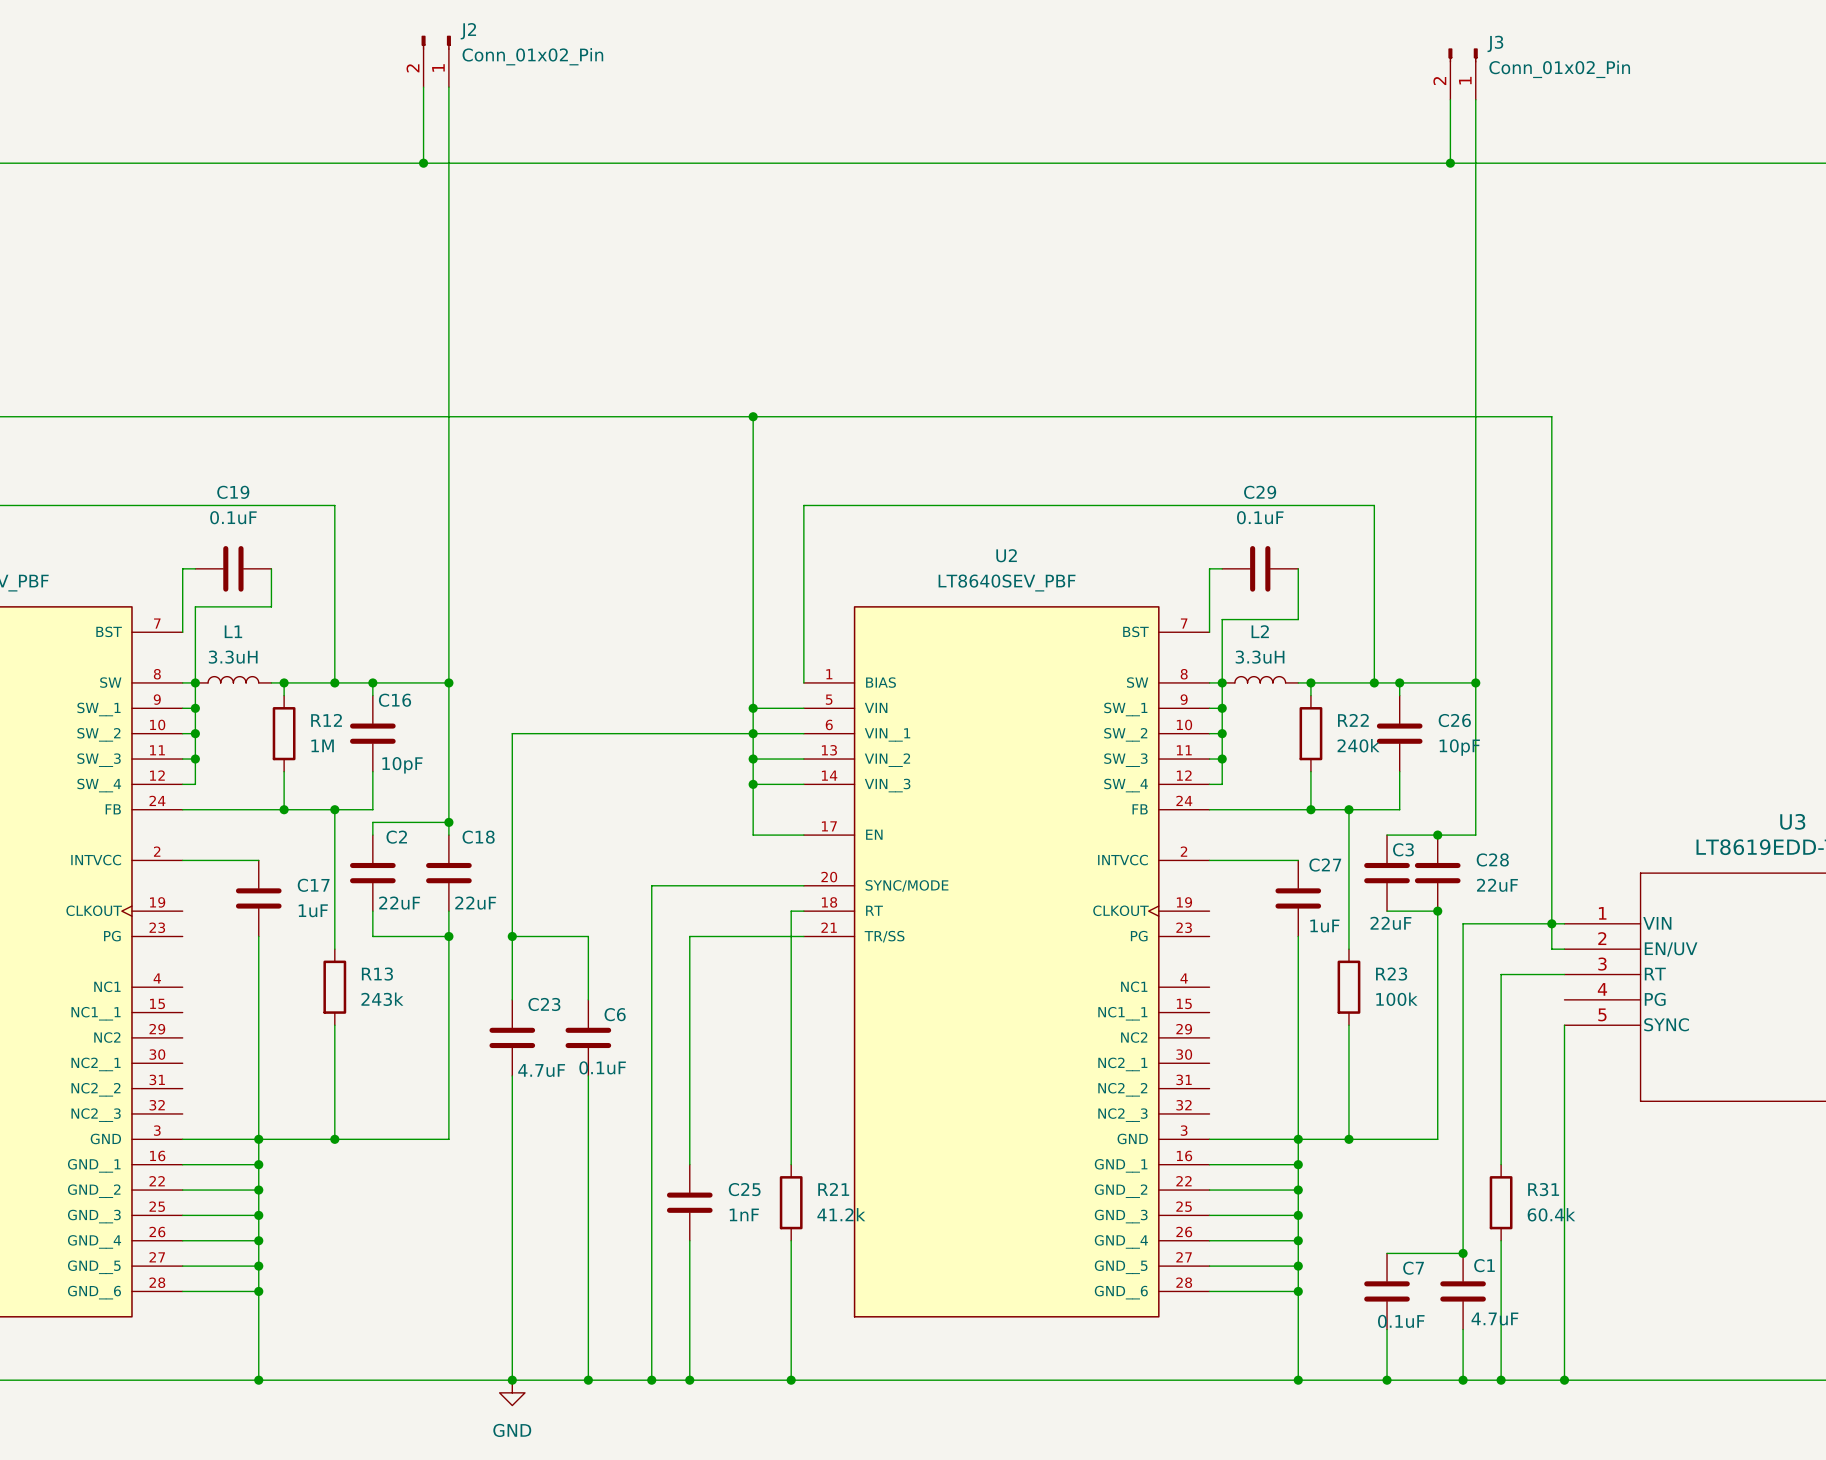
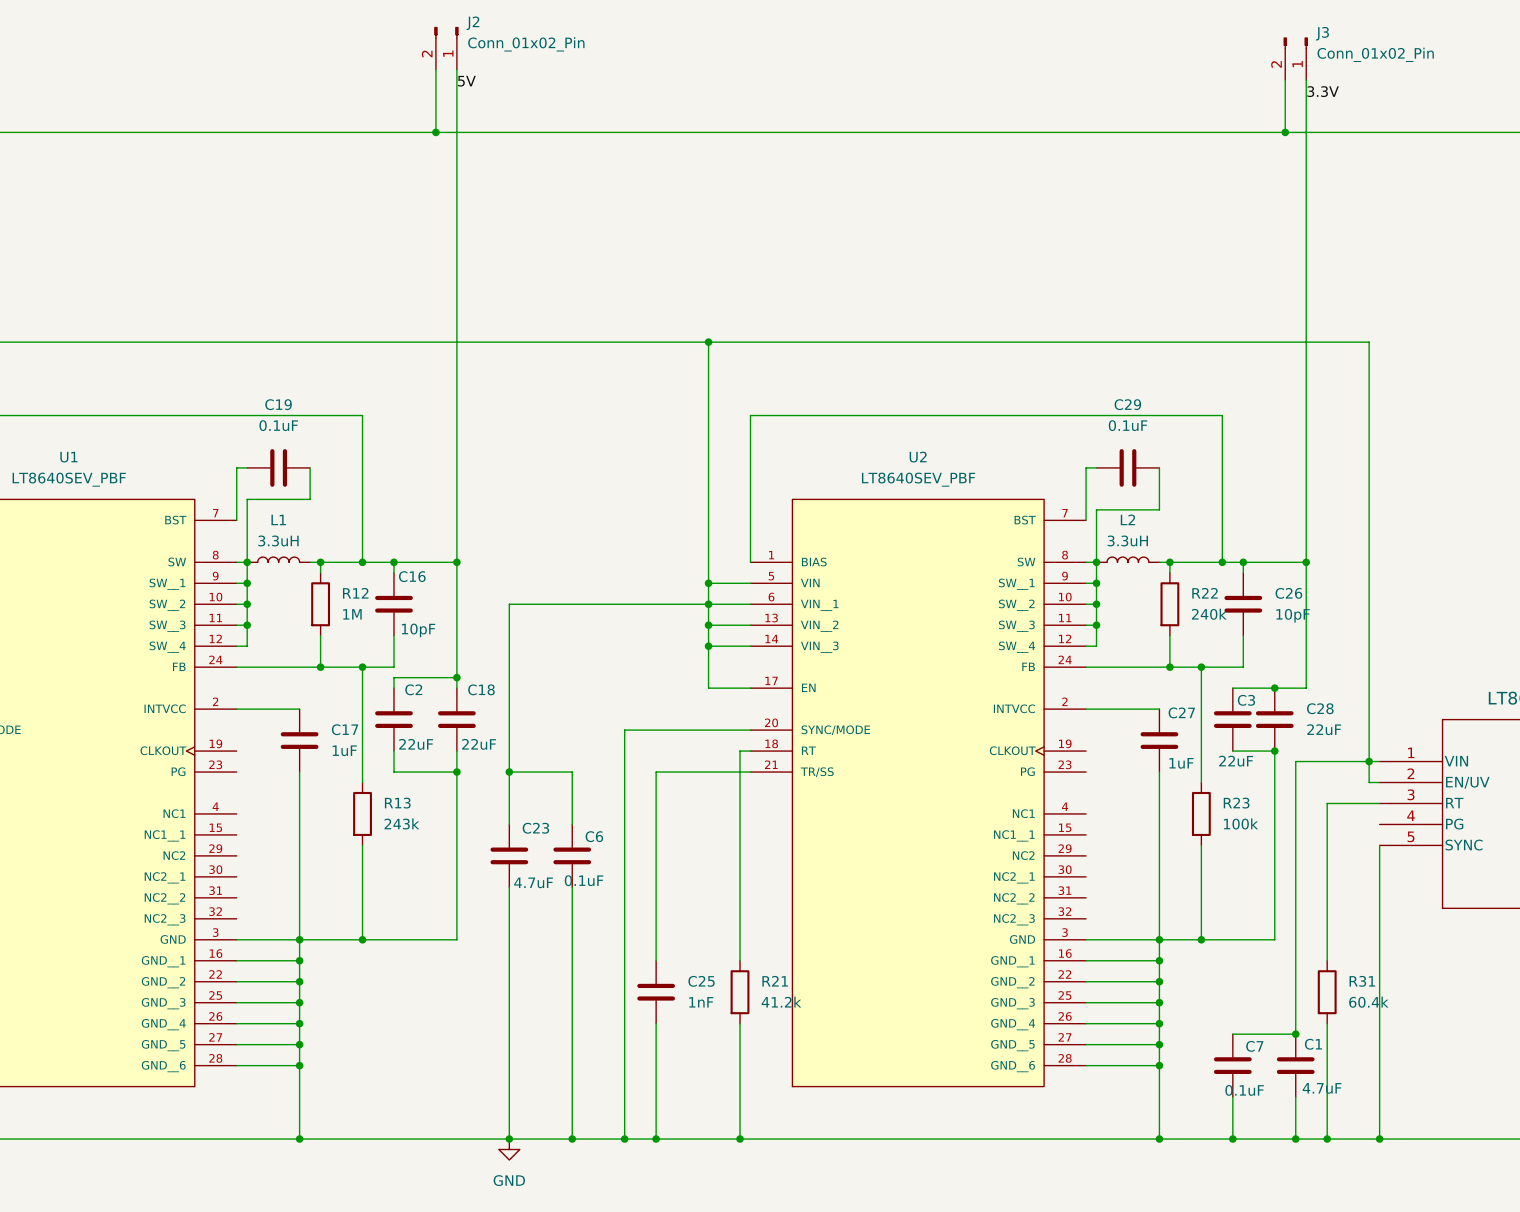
label: none -> 5V (466, 81)
label: none -> 3.3V (1323, 91)

